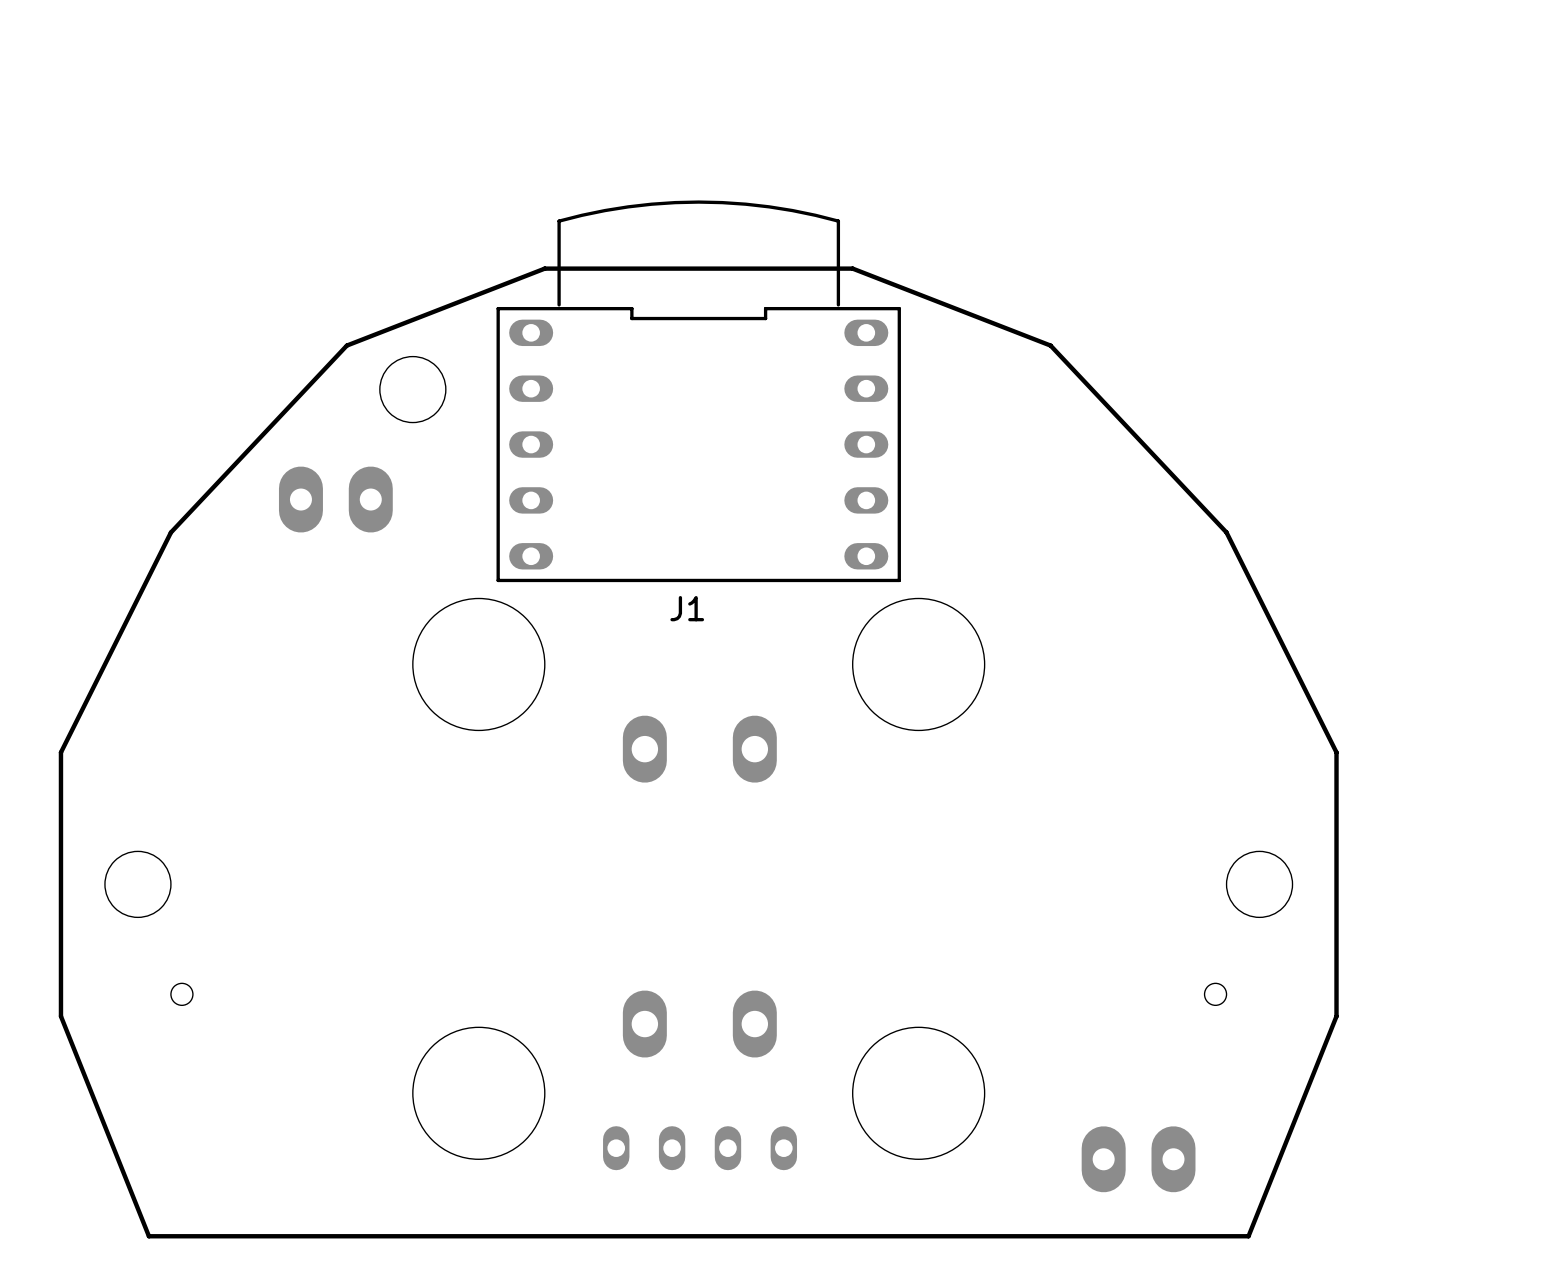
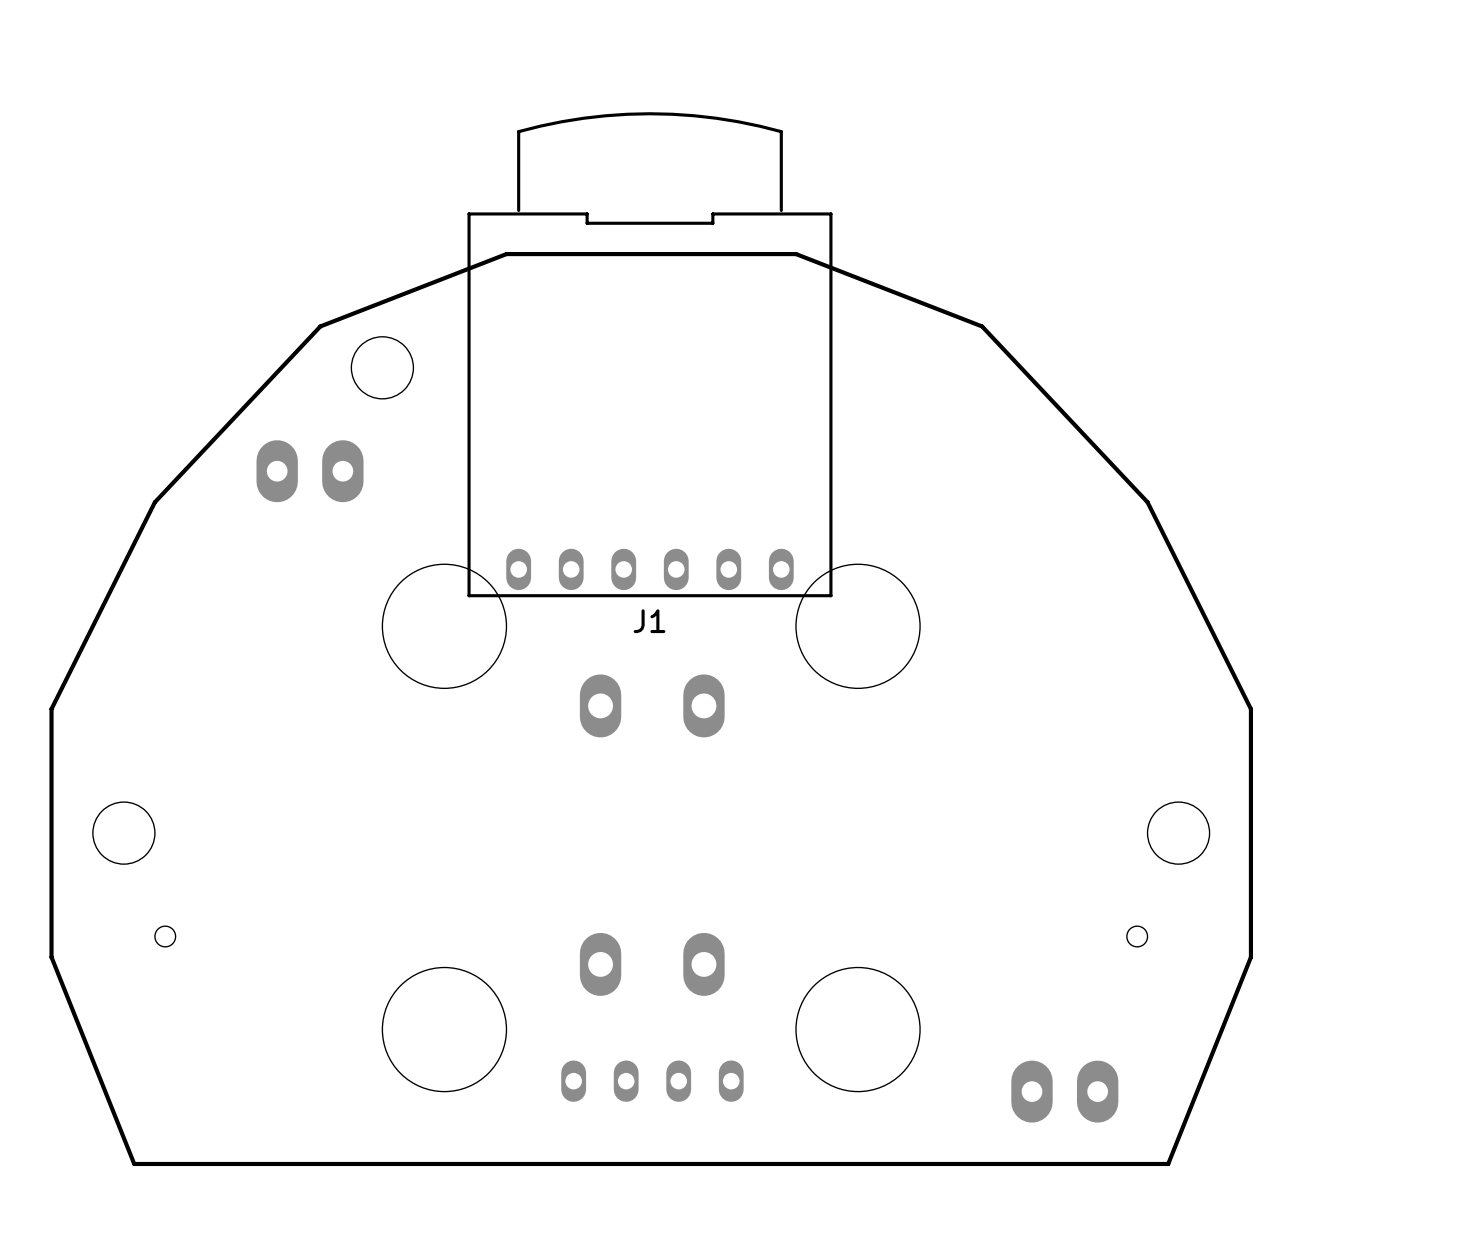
J1 footprint: [496, 200, 901, 583] -> [467, 112, 833, 598]
J1 name position: J1 (687, 608) -> J1 (649, 621)

